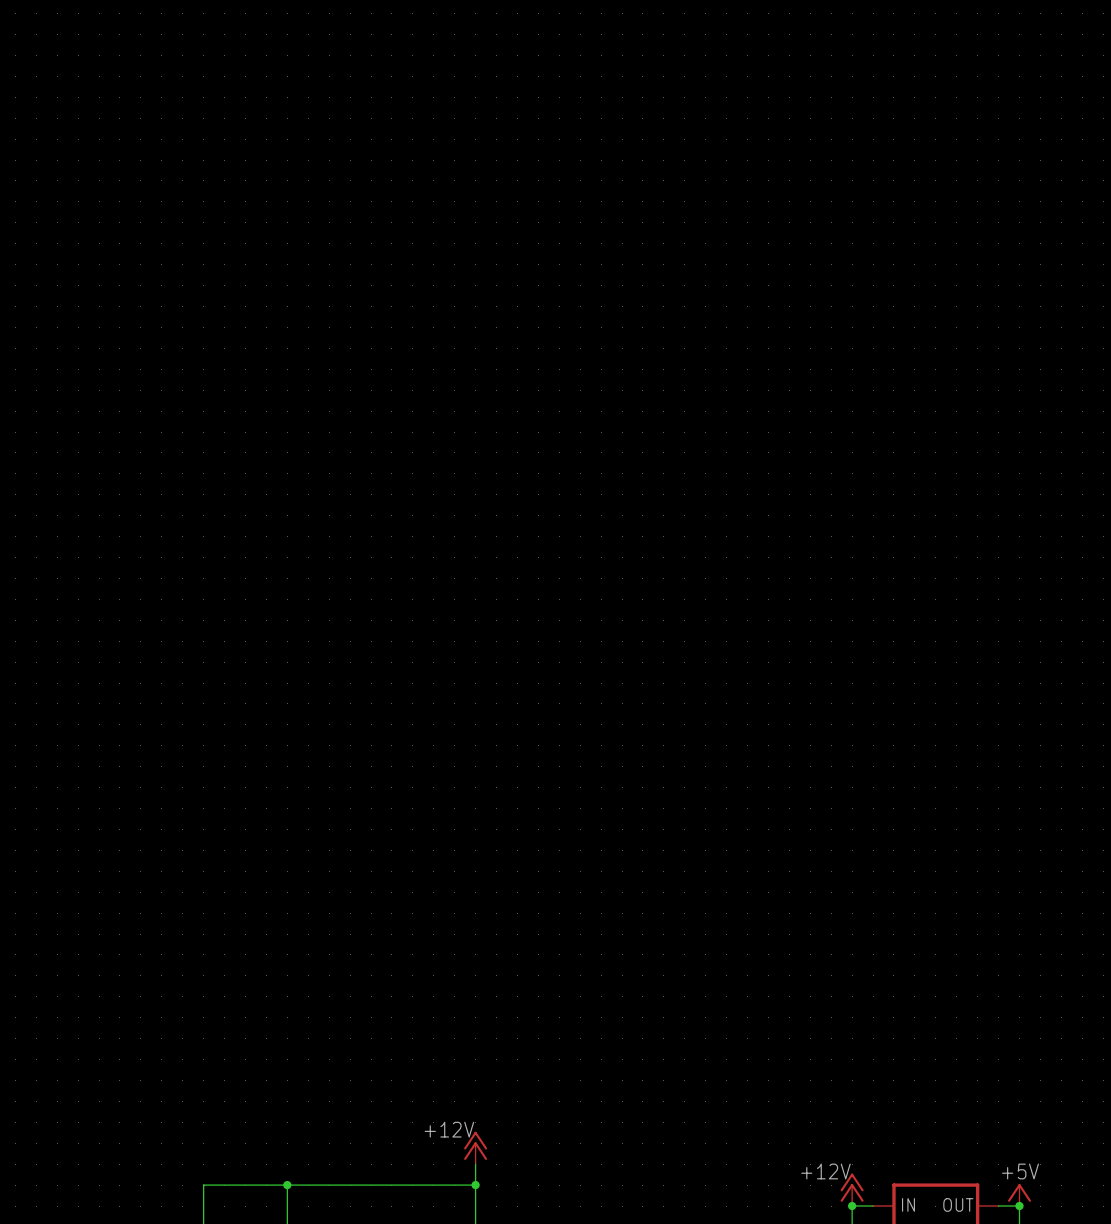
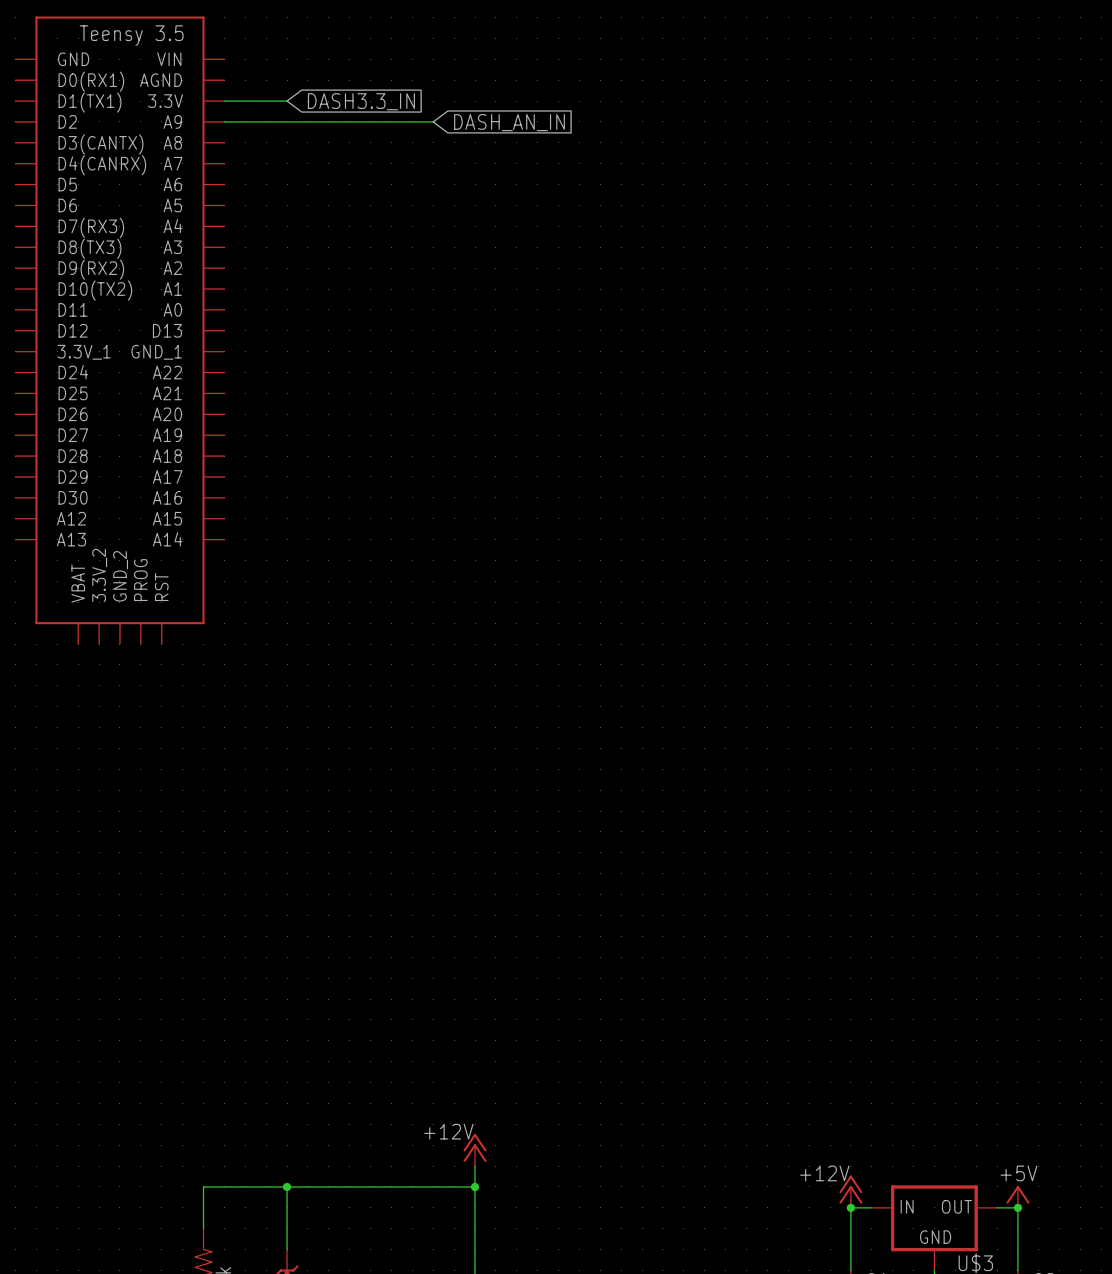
wire: none -> (224, 101) (287, 101)
global label: none -> DASH3.3_IN (361, 101)
wire: none -> (224, 121) (433, 121)
global label: none -> DASH_AN_IN (509, 122)
part: none -> (119, 330)

